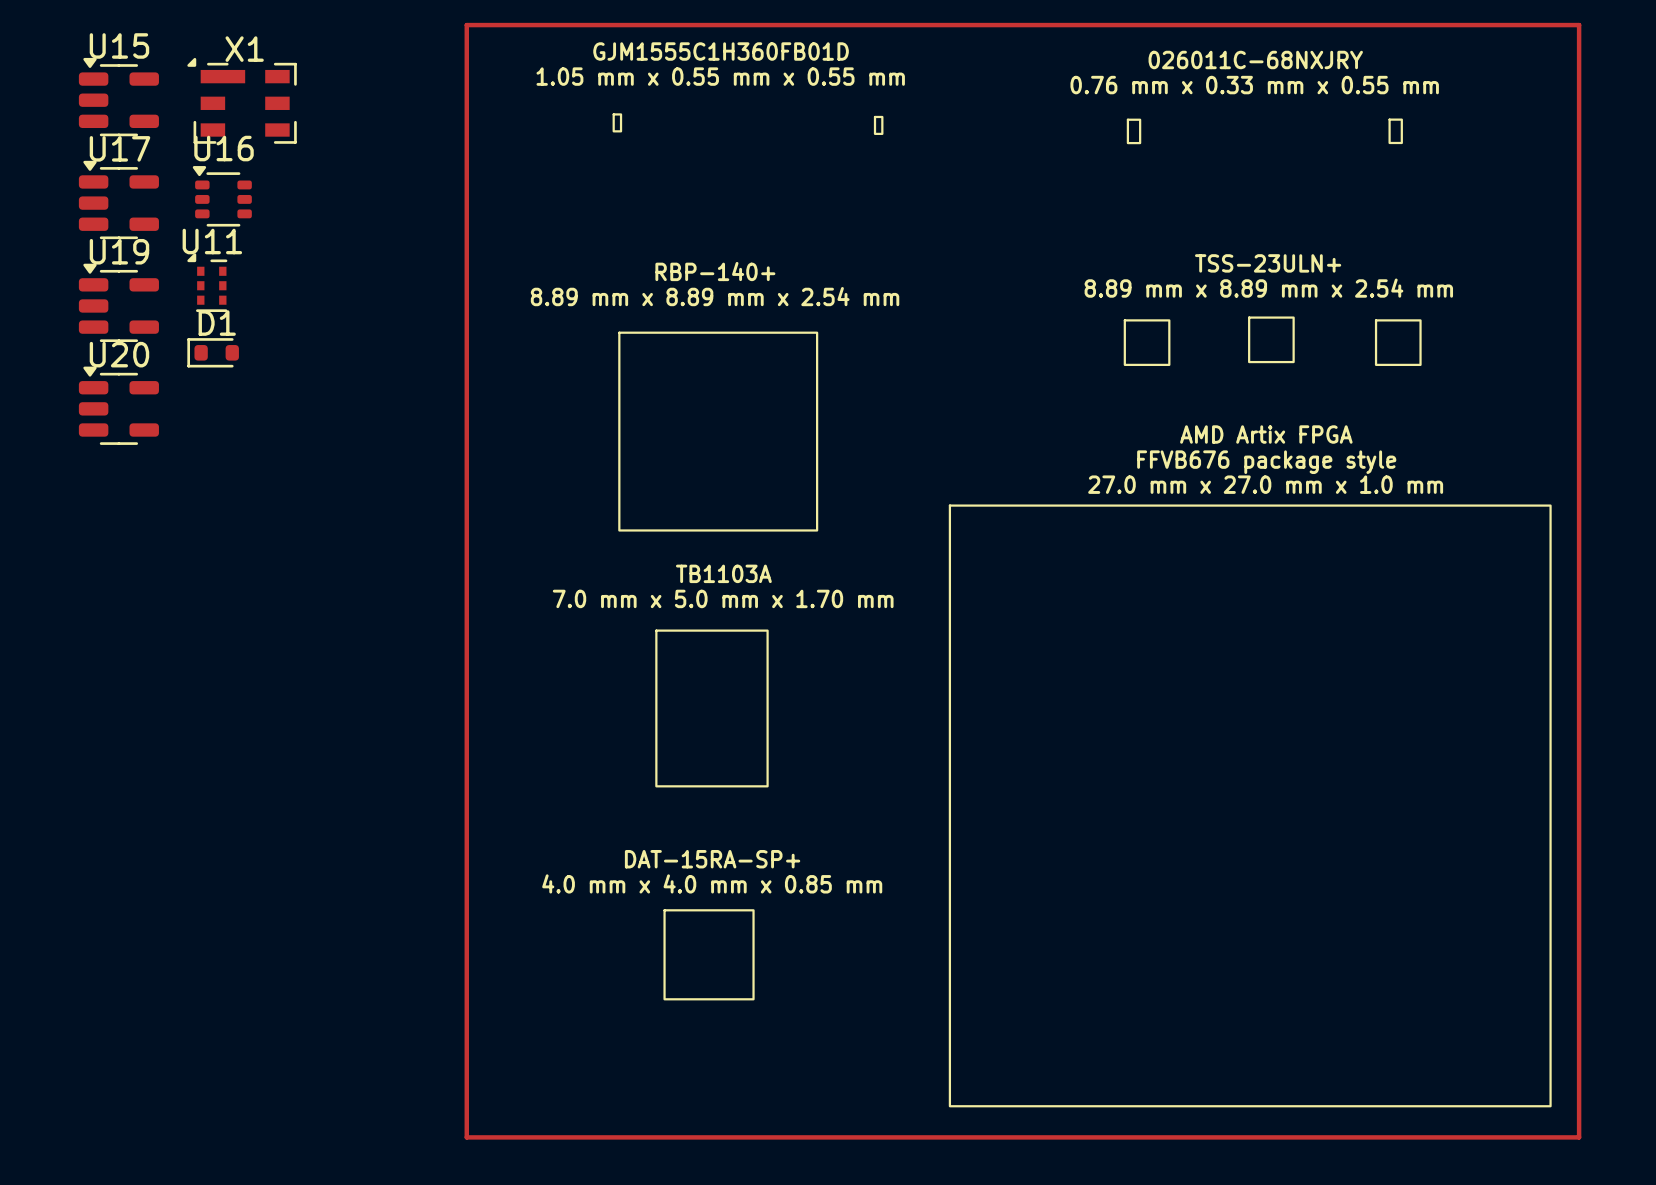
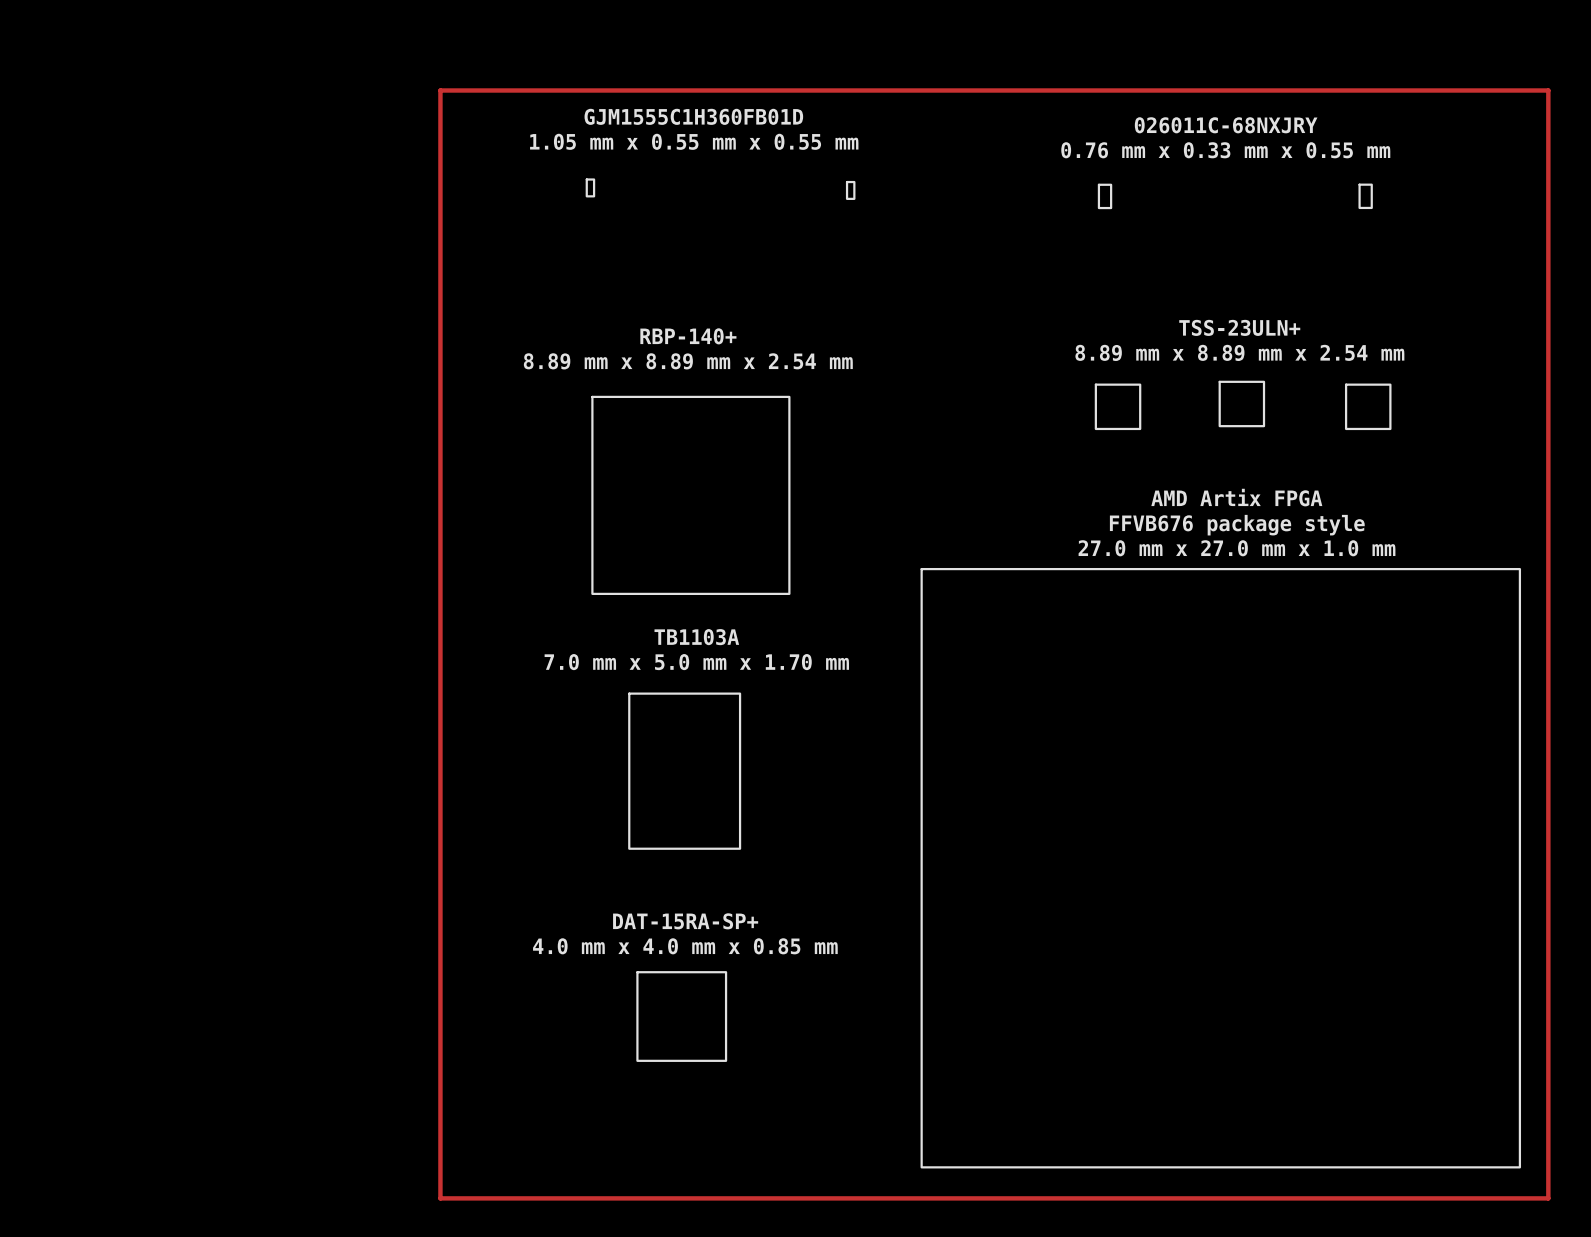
U15: (118, 97) -> none
X1: (242, 100) -> none
U16: (222, 196) -> none
U17: (118, 199) -> none
U11: (207, 282) -> none
U19: (118, 302) -> none
D1: (213, 352) -> none
U20: (118, 405) -> none

